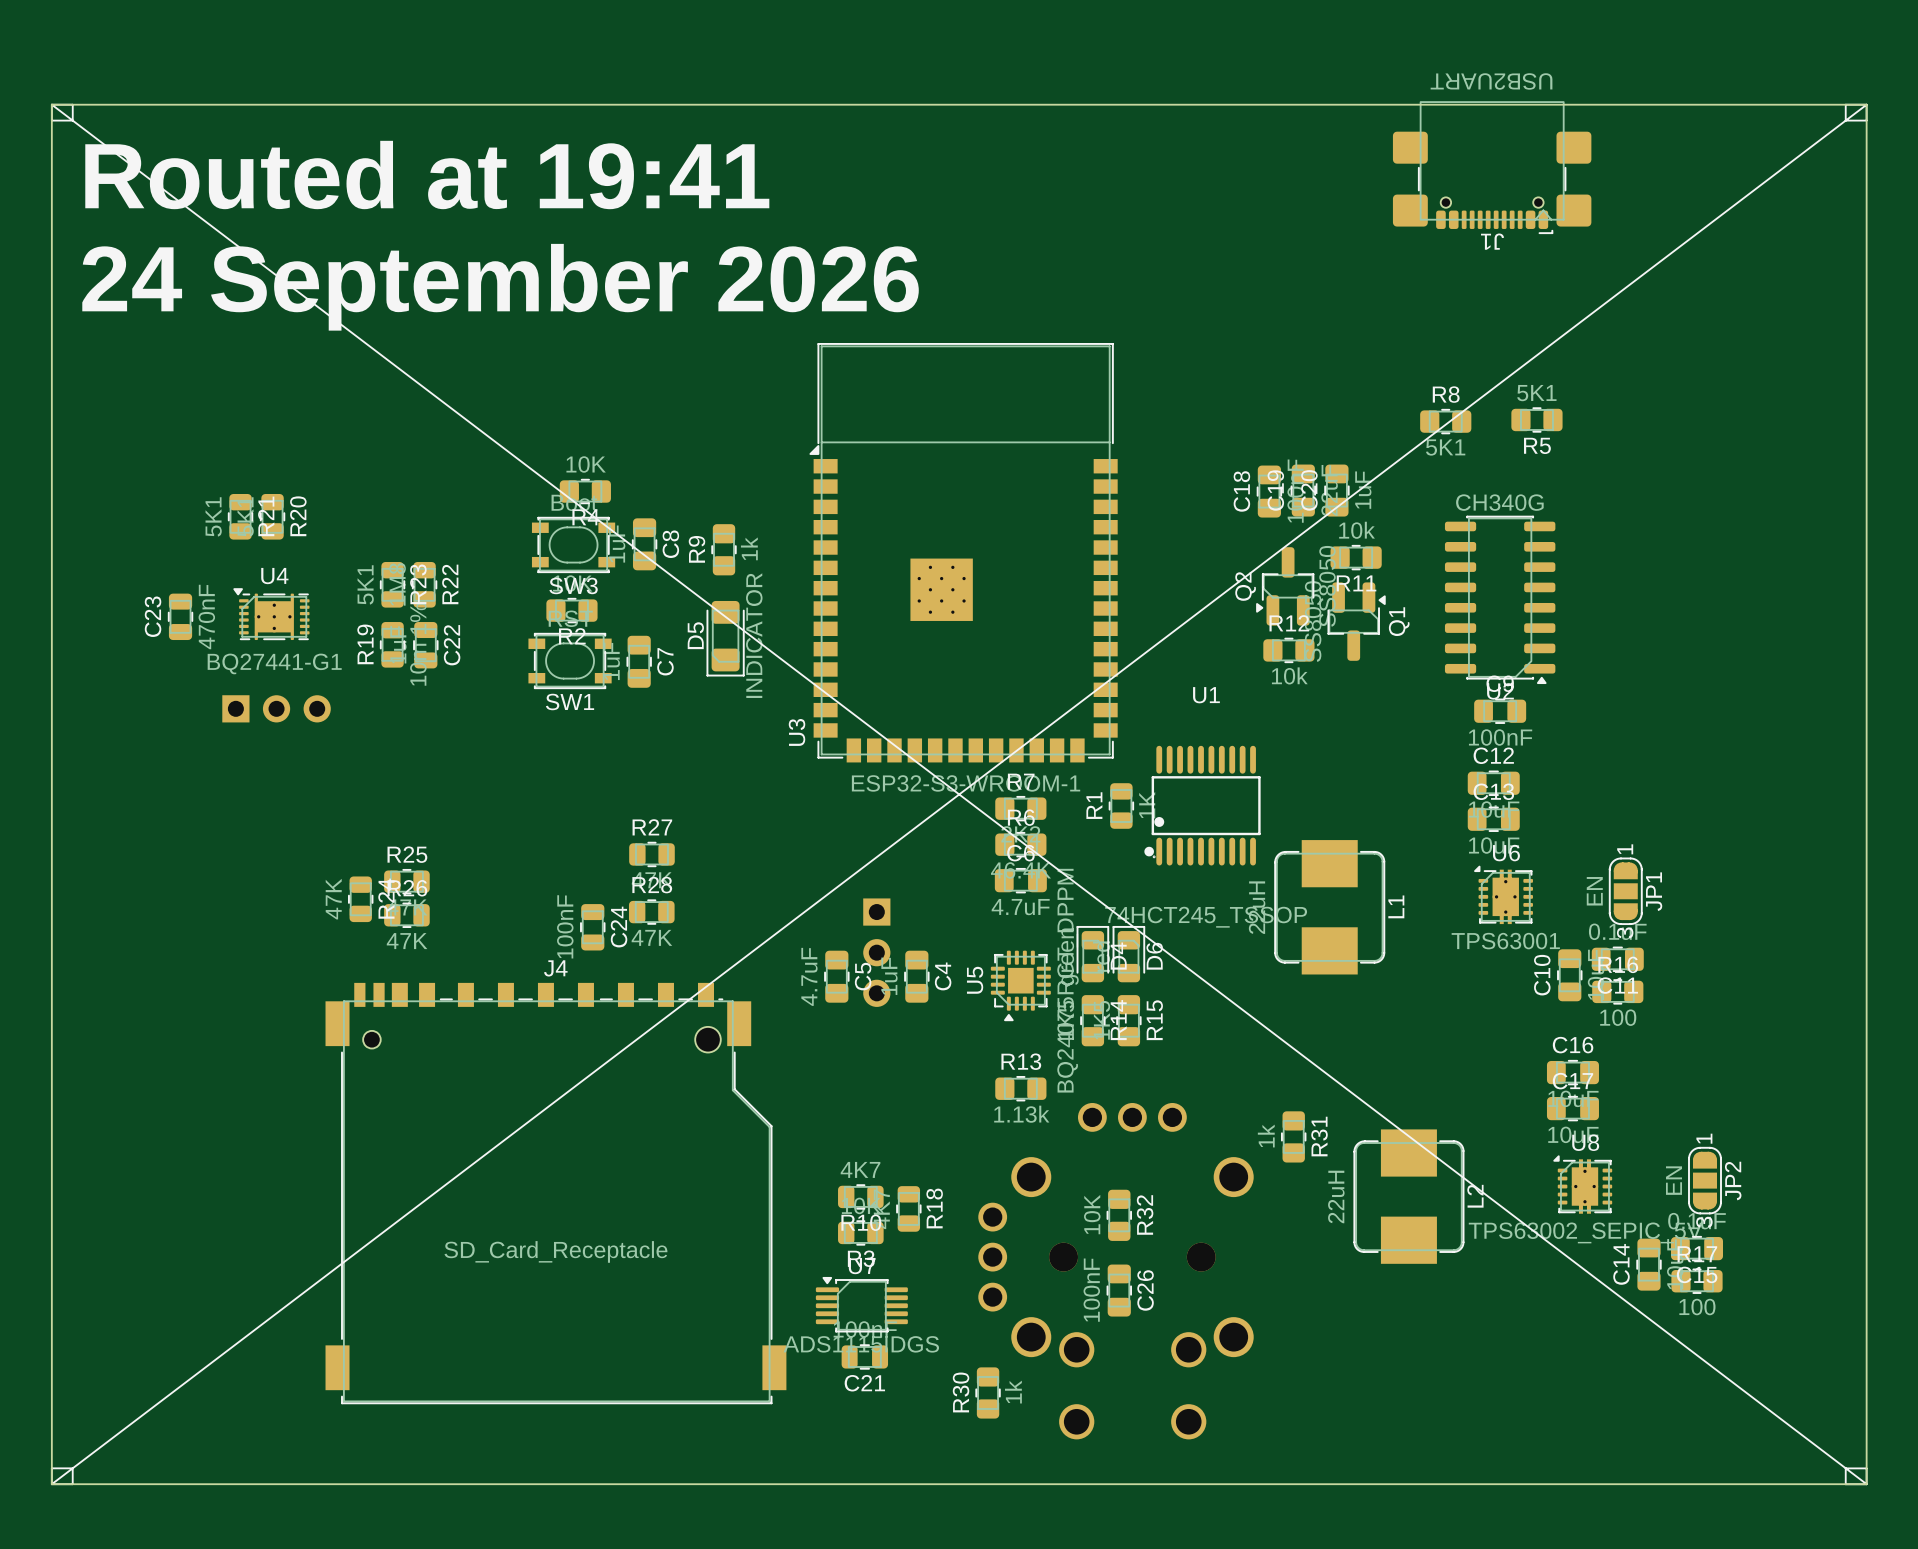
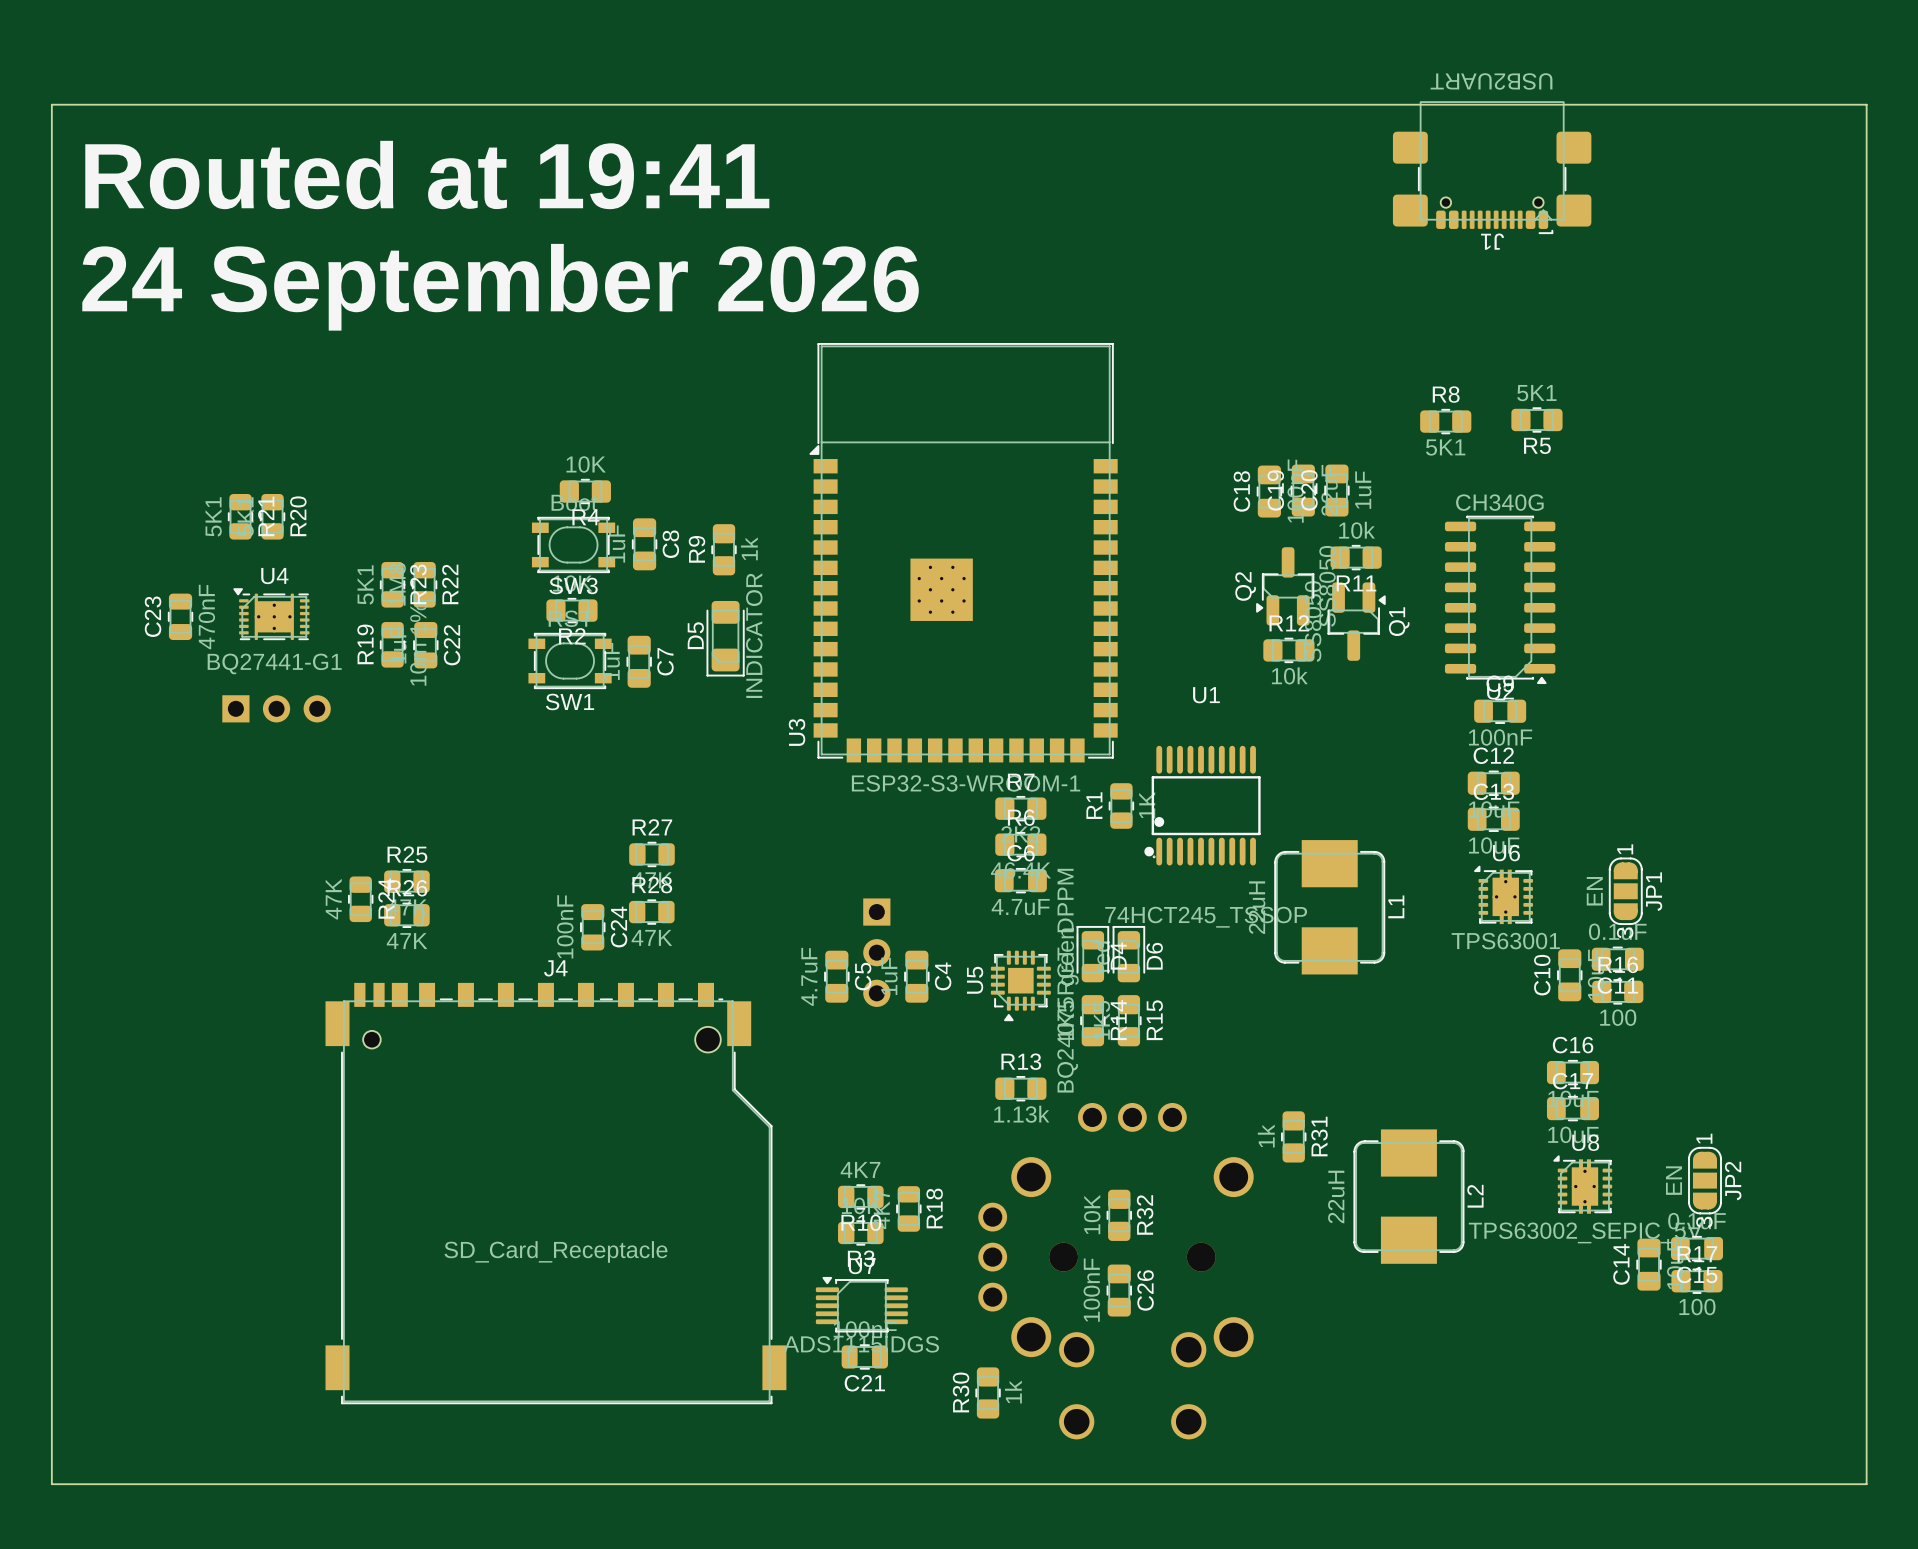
line: (51, 104) (51, 120) (72, 120) (72, 104) (51, 104) -> none
line: (51, 104) (1866, 1484) -> none
line: (1866, 104) (1845, 104) (1845, 120) (1866, 120) (1866, 104) -> none
line: (1866, 104) (51, 1484) -> none
line: (51, 1484) (72, 1484) (72, 1468) (51, 1468) (51, 1484) -> none
line: (1866, 1484) (1845, 1484) (1845, 1468) (1866, 1468) (1866, 1484) -> none

